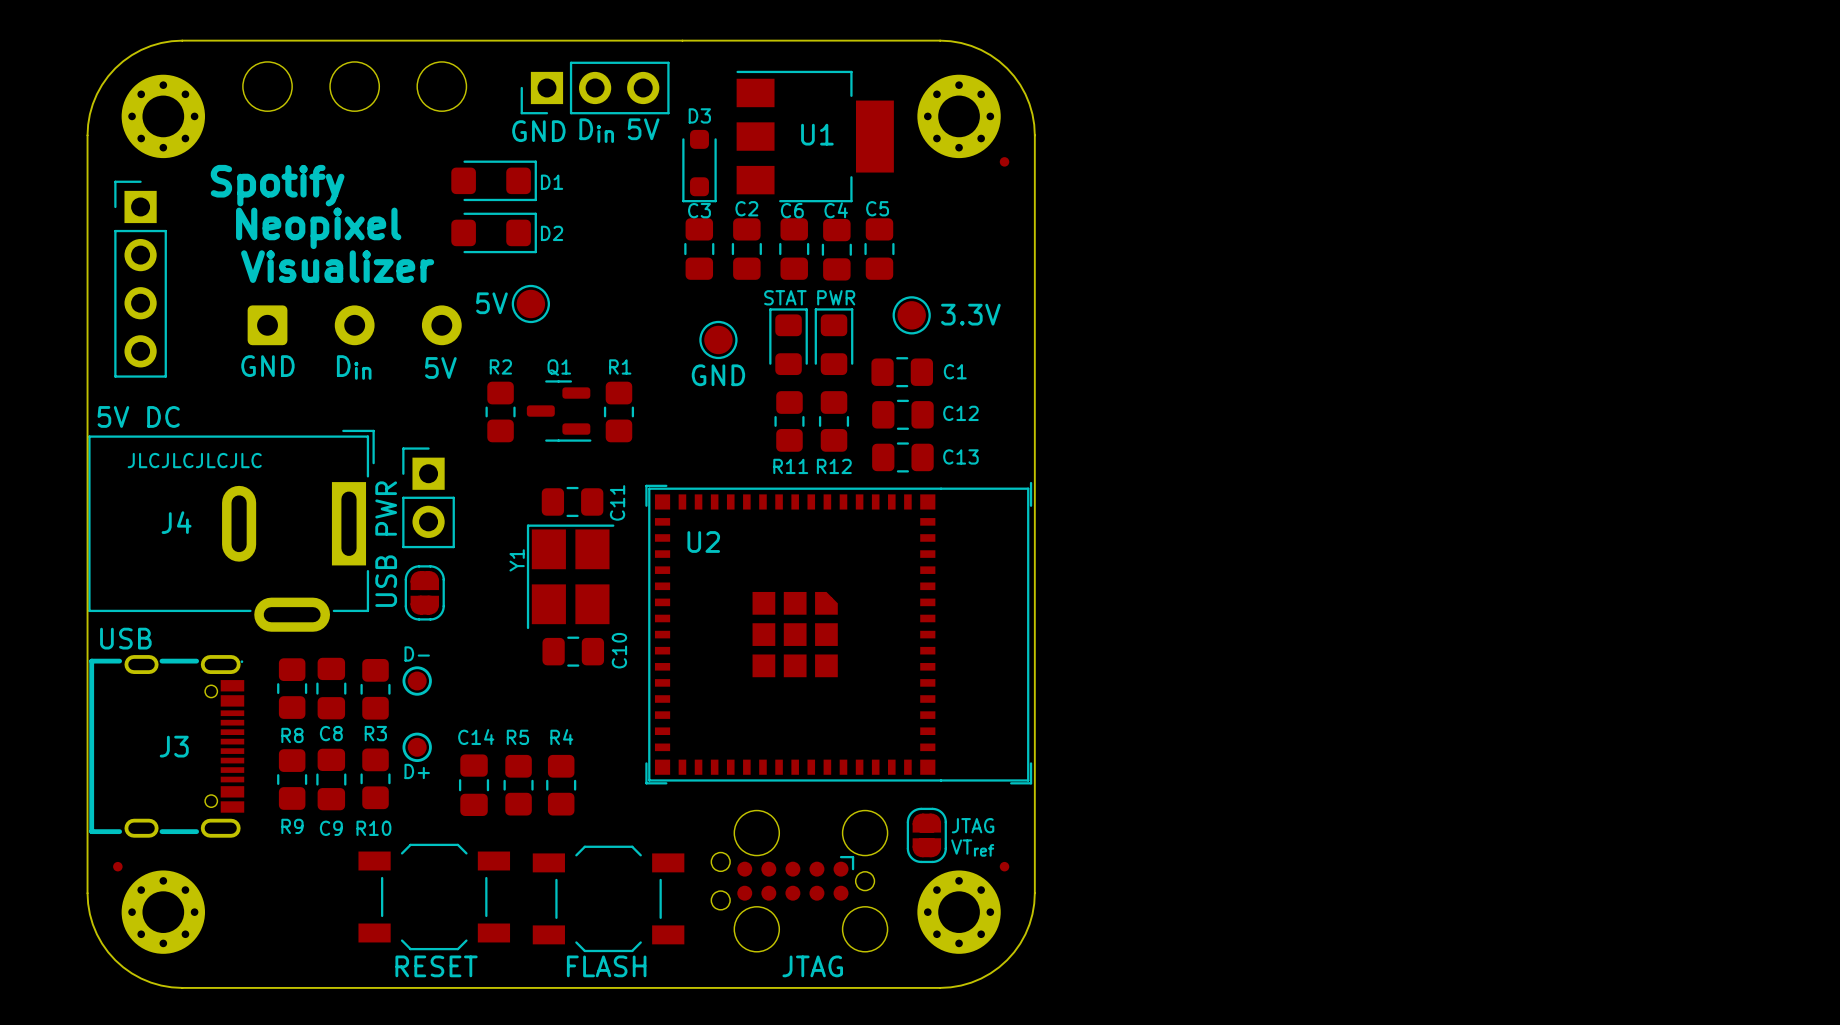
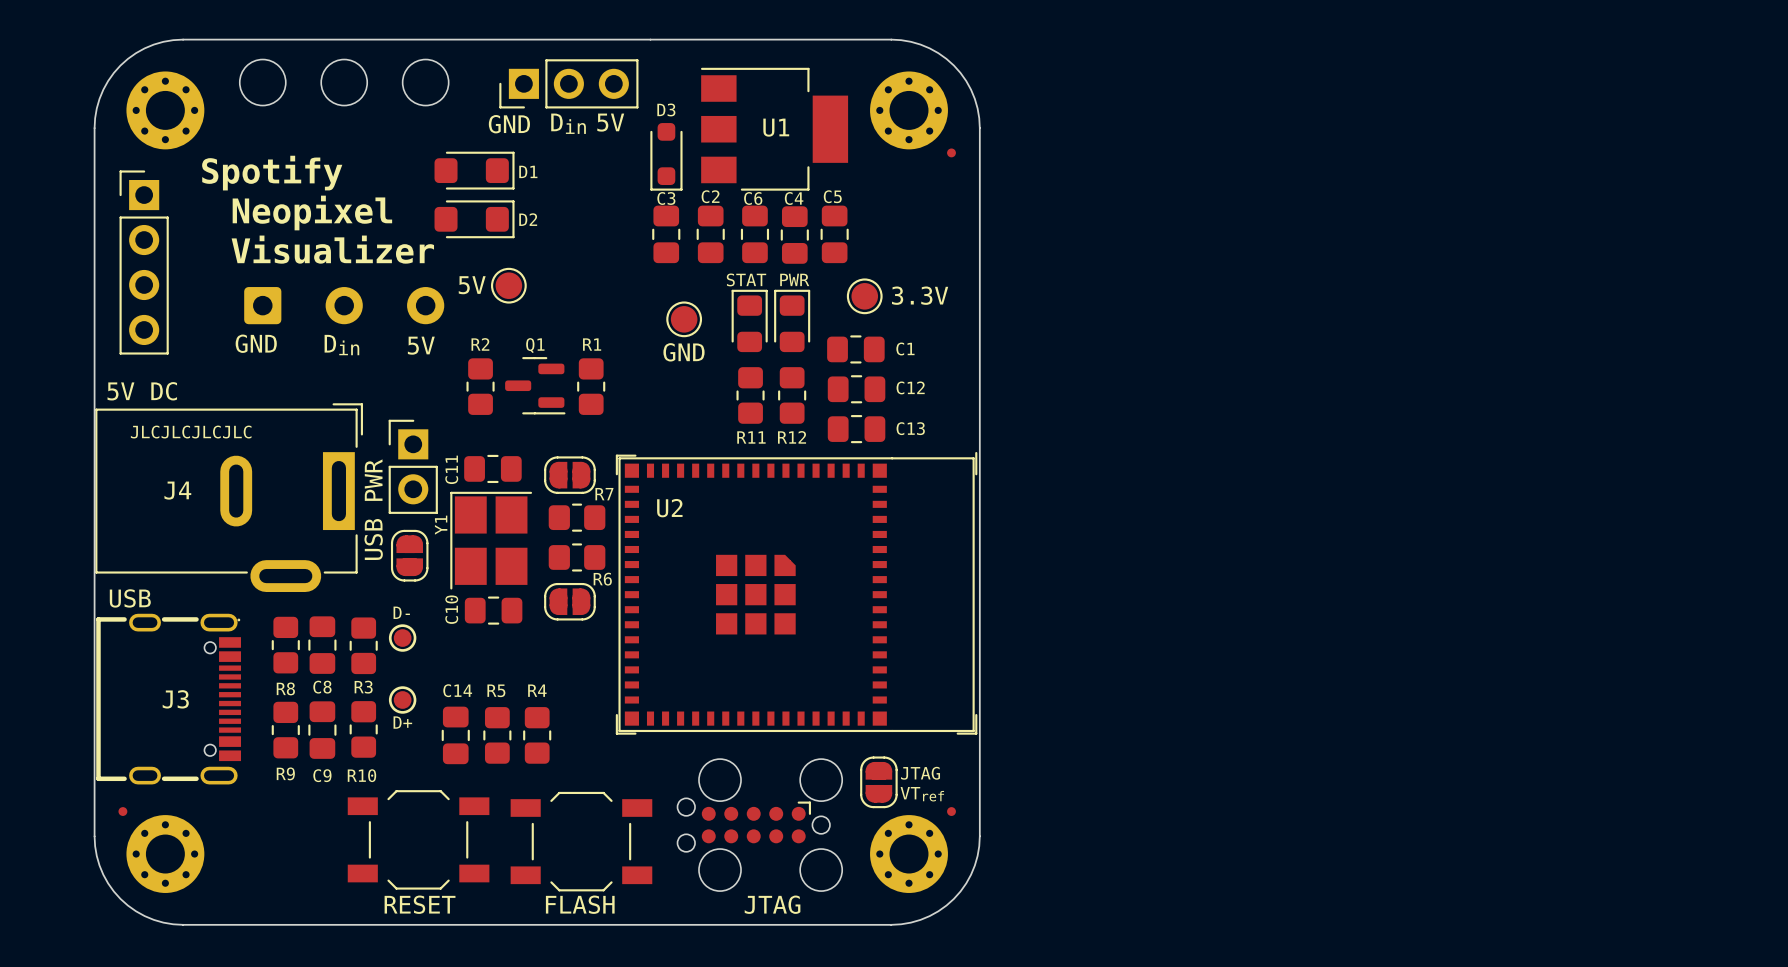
C11 position: (572, 501) -> (492, 468)
C11 name position: C11 (617, 502) -> C11 (451, 469)
part: none -> (569, 475)
R7: none -> (577, 517)
Y1 position: (570, 576) -> (491, 540)
R6: none -> (577, 557)
part: none -> (569, 601)
C10 name position: C10 (619, 650) -> C10 (451, 609)
C10 position: (573, 651) -> (493, 610)

